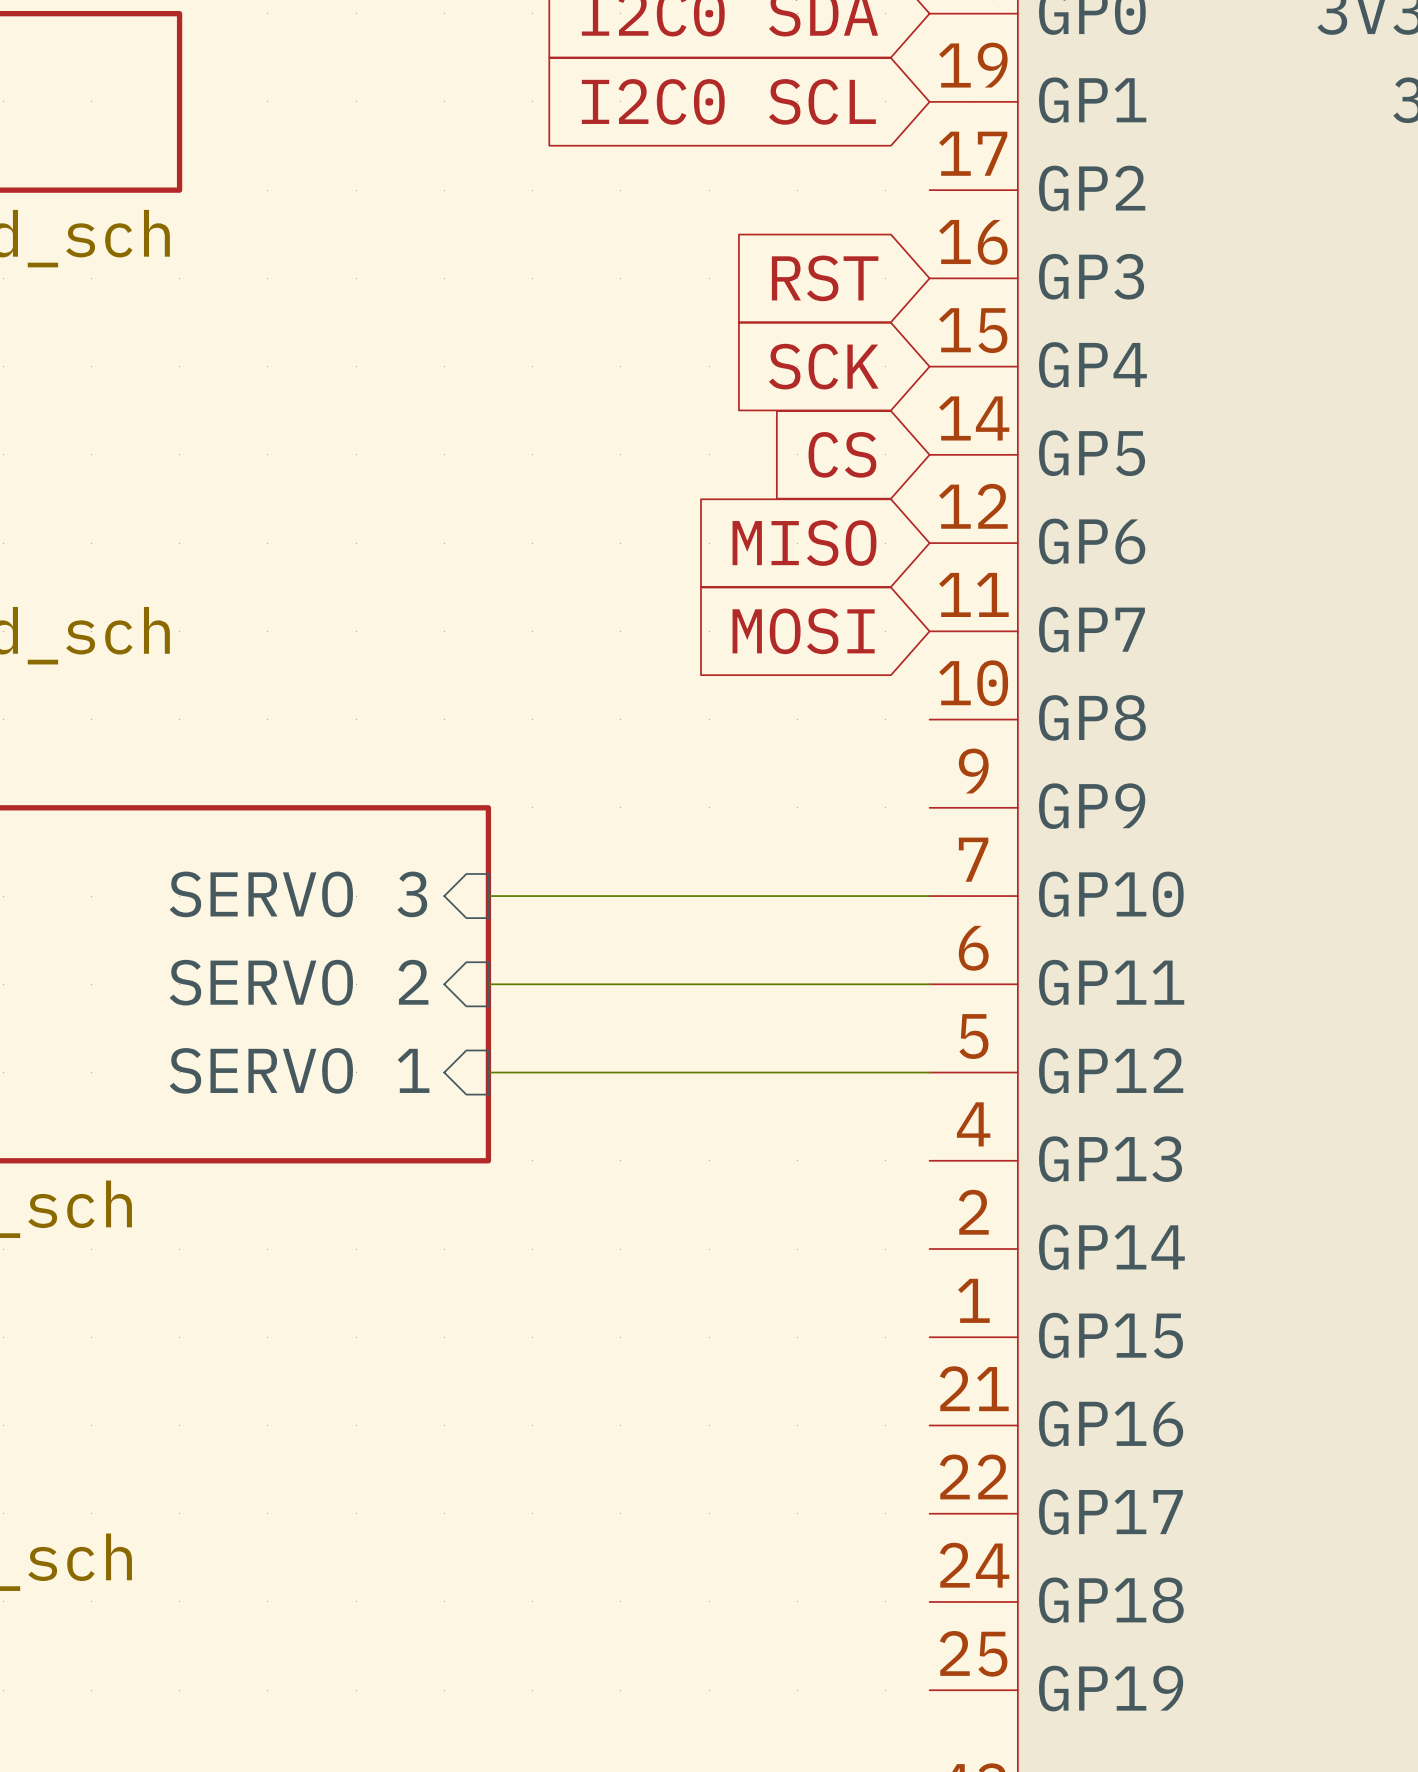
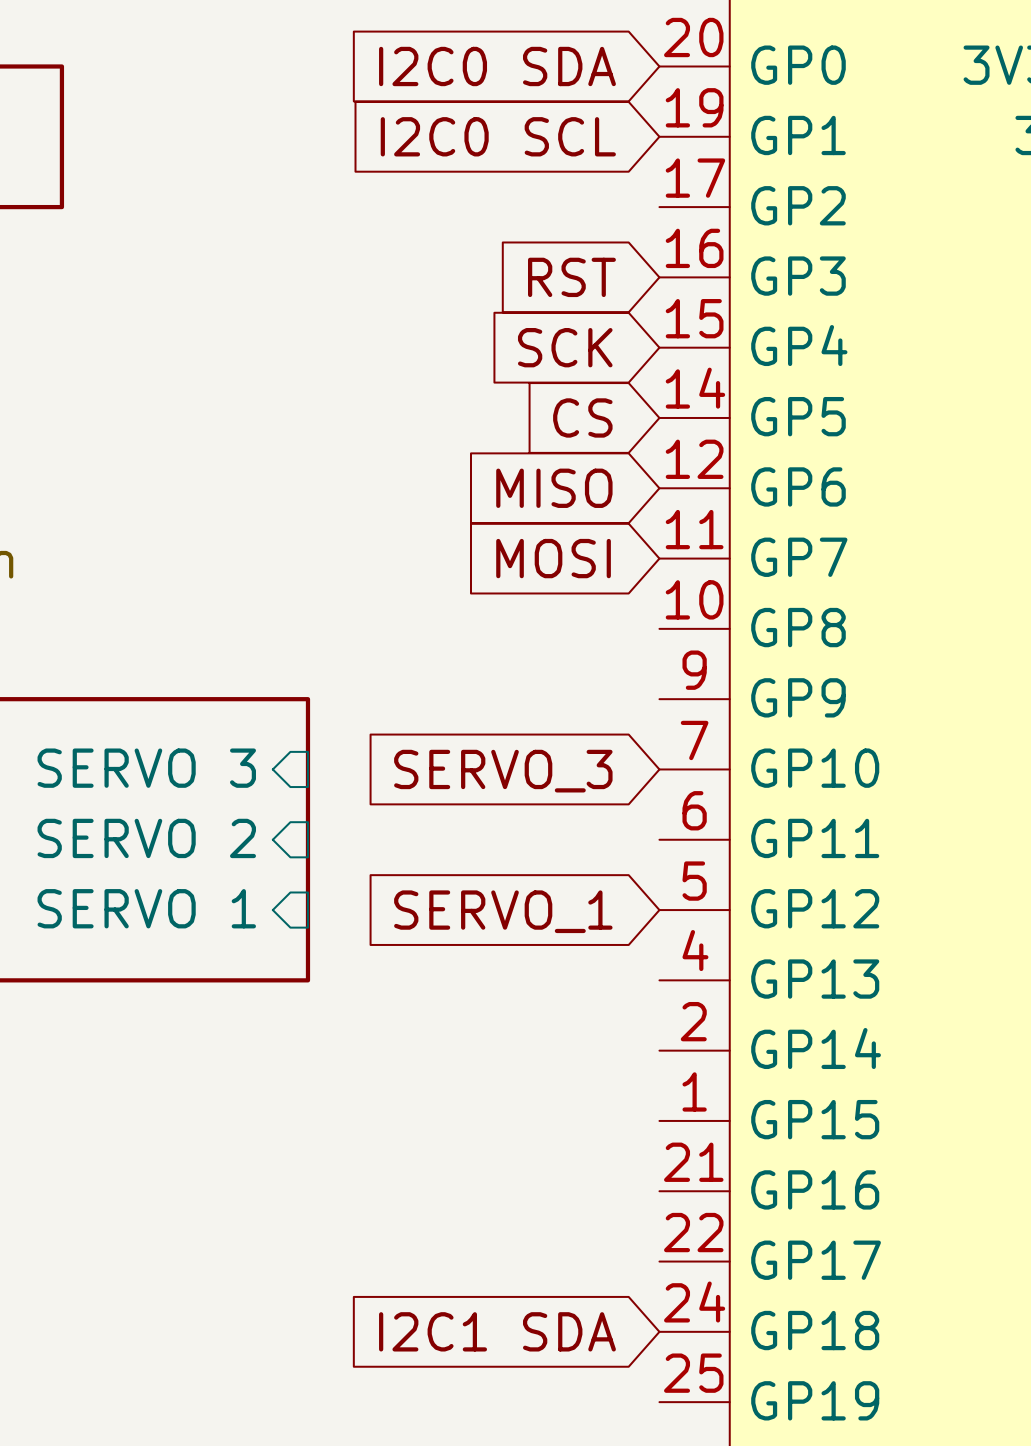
wire: (488, 896) (929, 896) -> none
global label: none -> SERVO_3 (503, 771)
wire: (488, 984) (929, 984) -> none
wire: (488, 1072) (929, 1072) -> none
global label: none -> SERVO_1 (503, 911)
global label: none -> I2C1 SDA (497, 1331)

